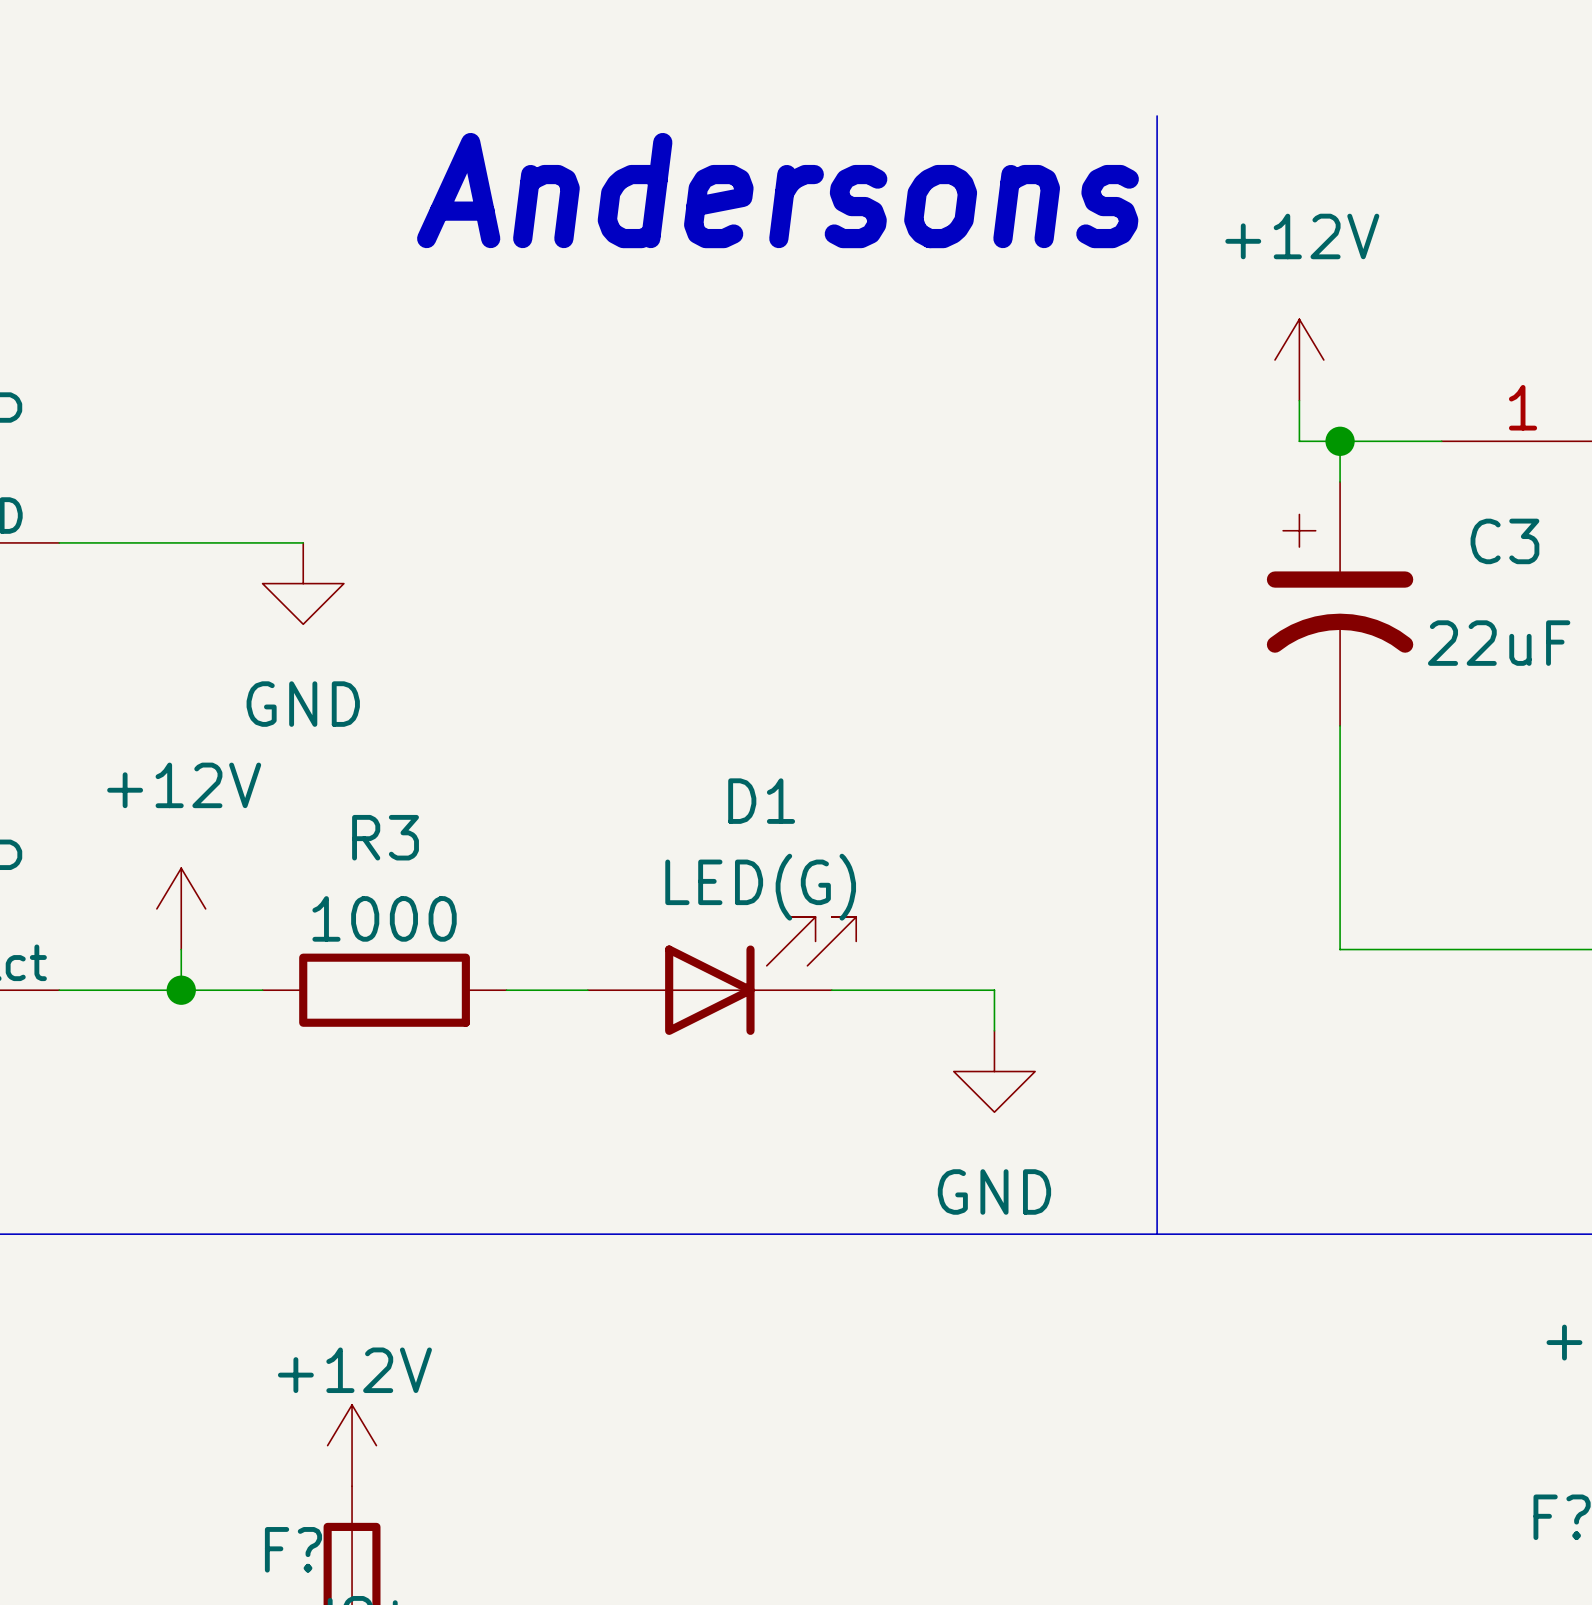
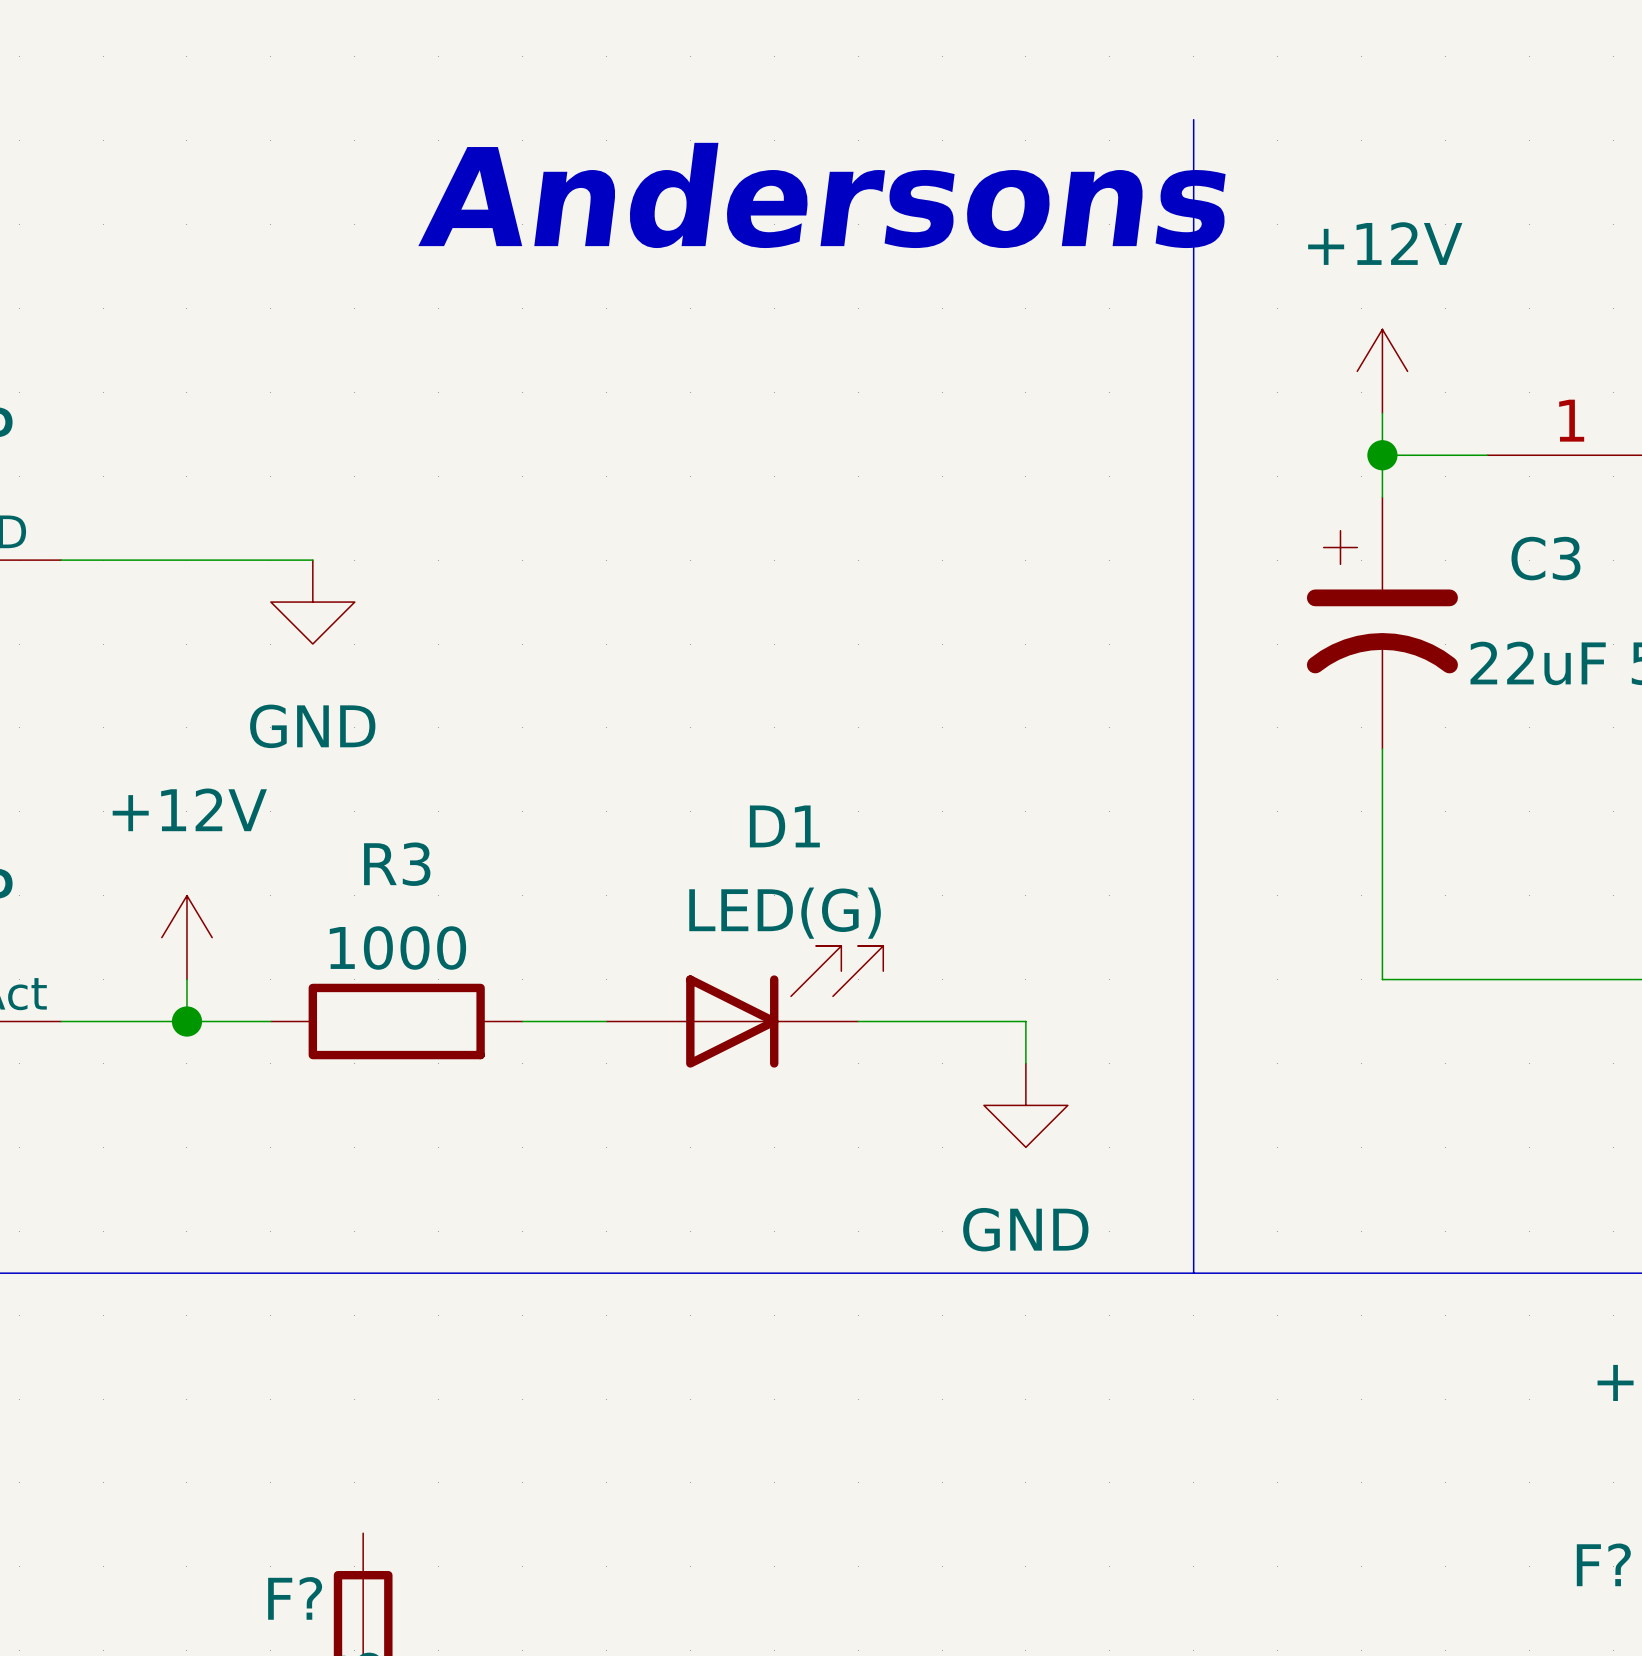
power symbol position: +12V (1299, 359) -> +12V (1382, 371)
wire: (1299, 400) (1299, 441) (1340, 441) -> (1382, 413) (1382, 455)
power symbol: +12V (352, 1445) -> none

